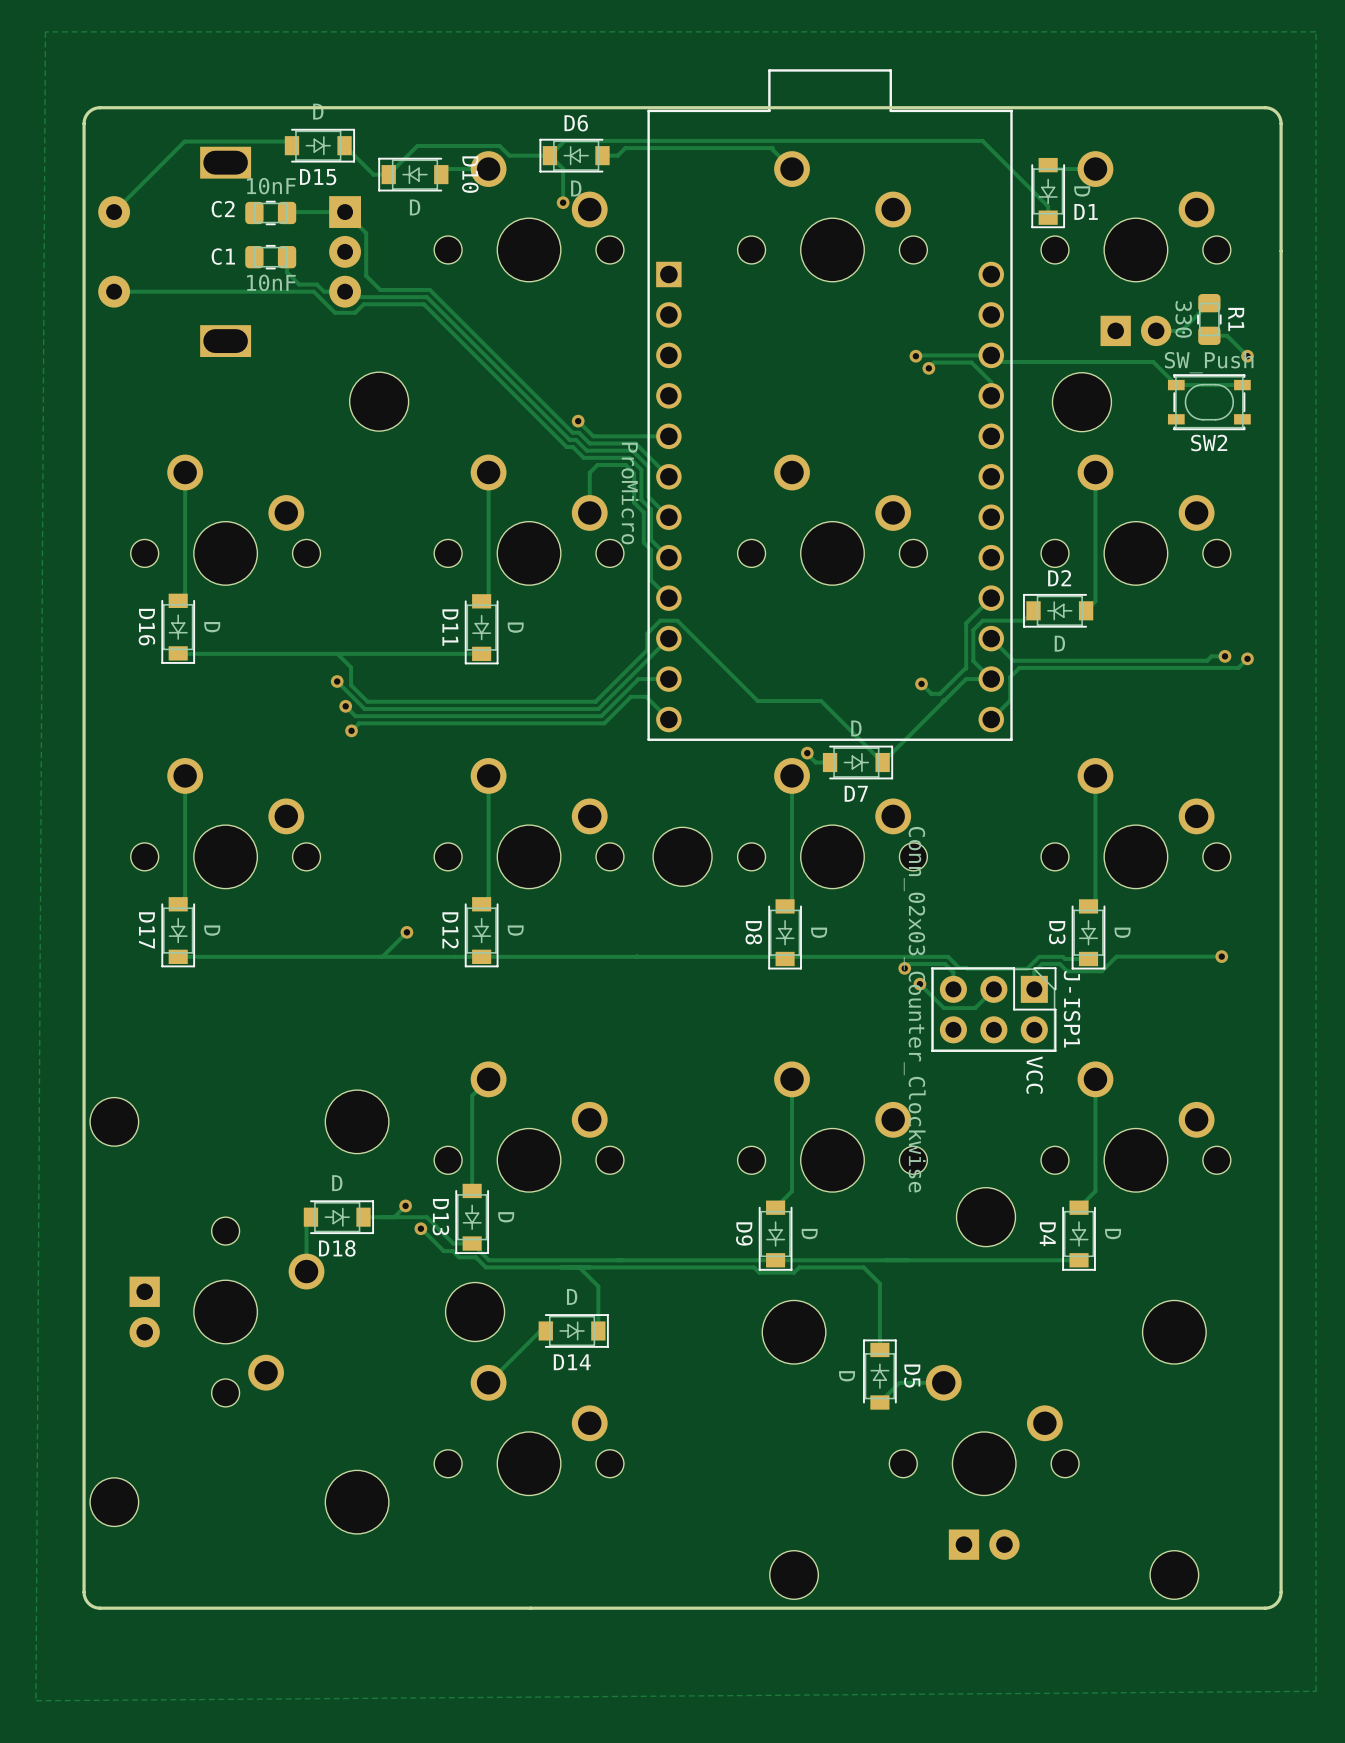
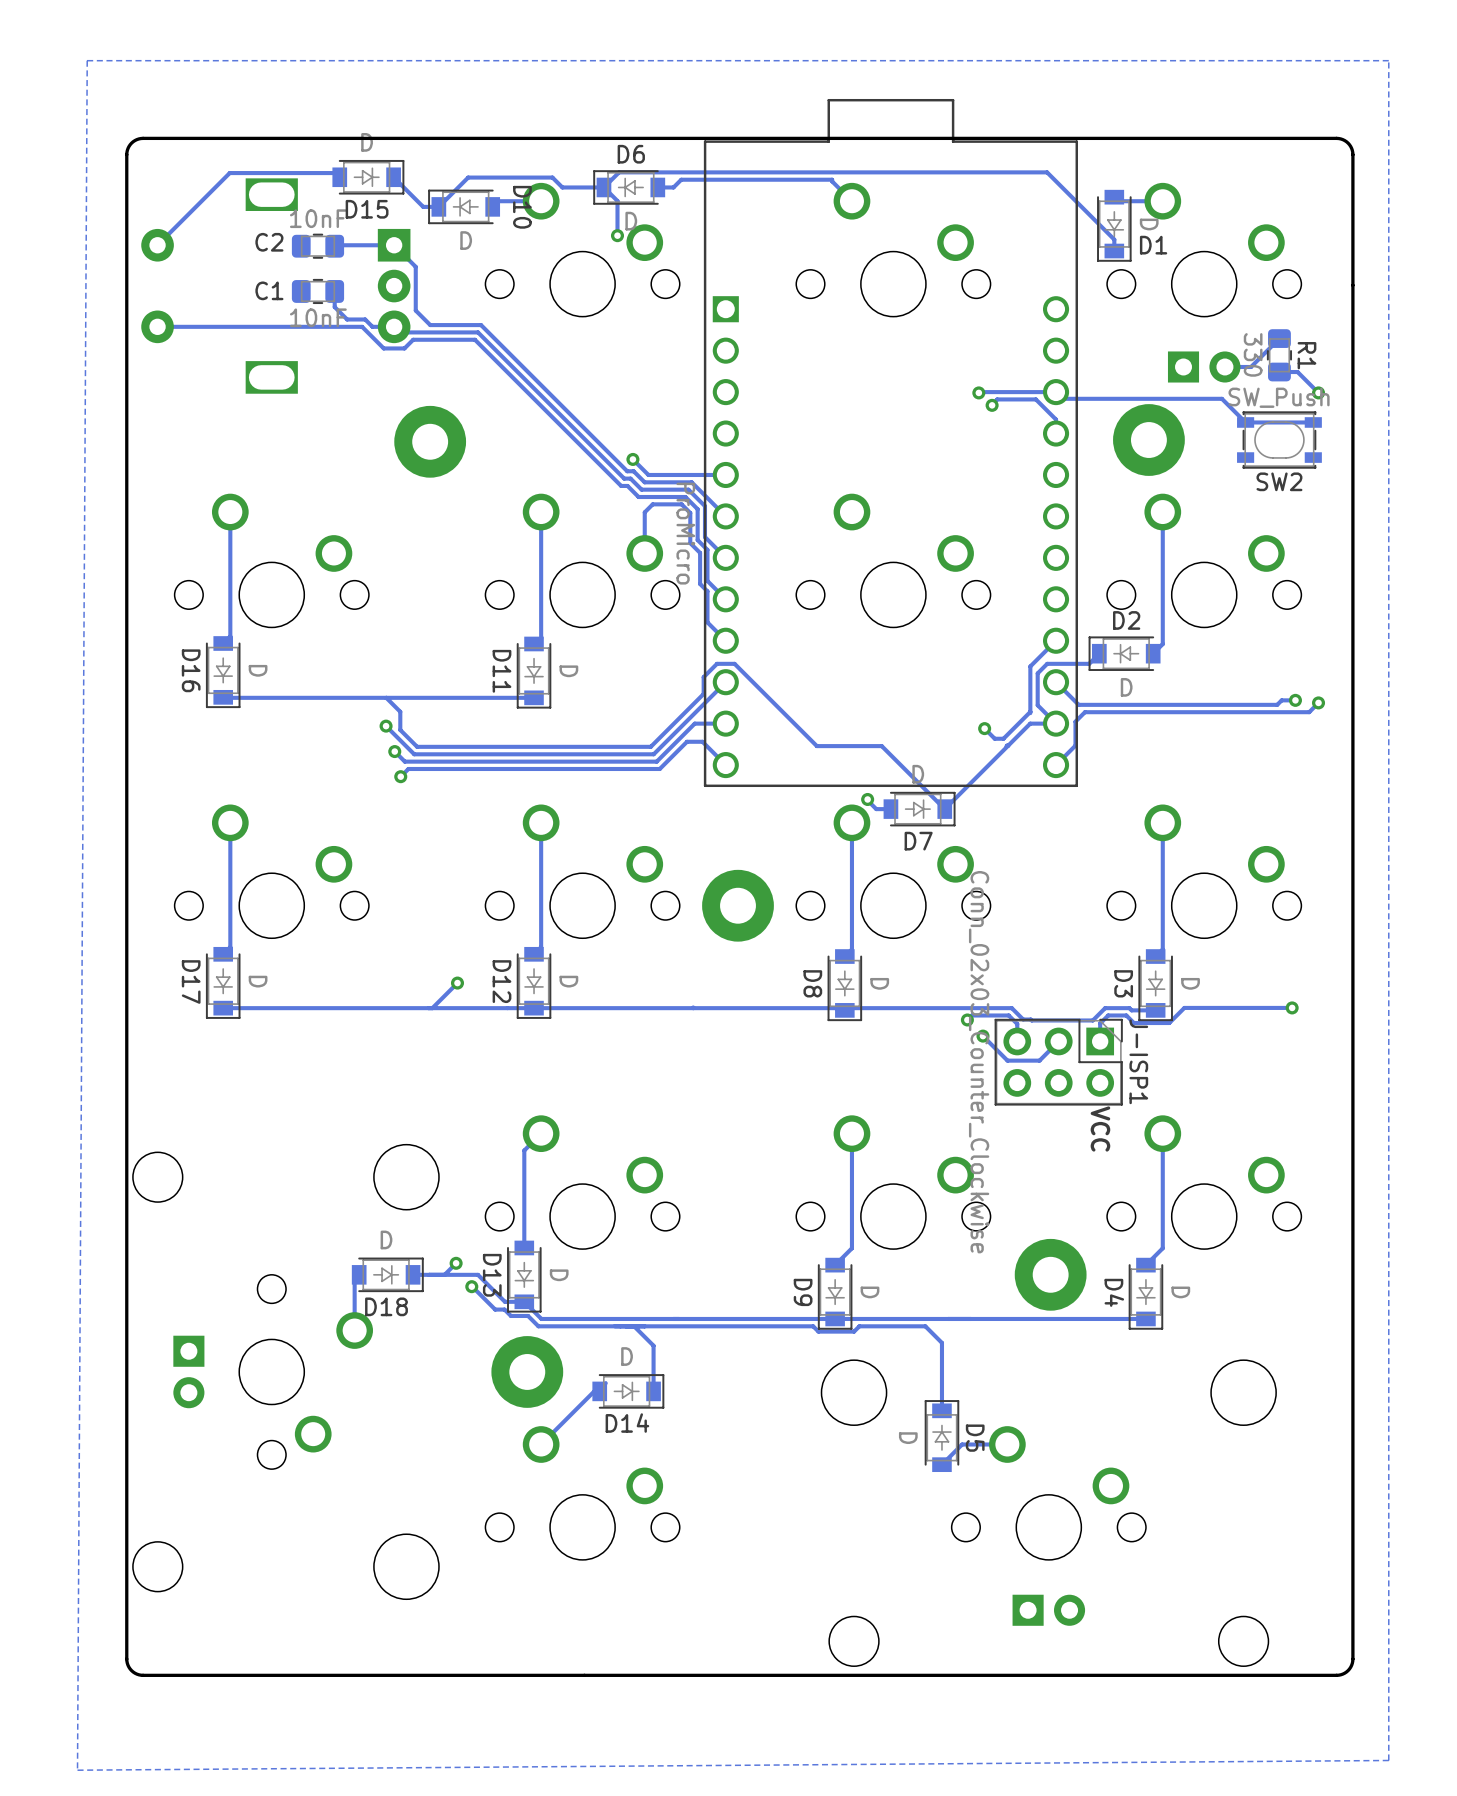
part footprint: [349, 372, 409, 432] -> [394, 405, 467, 478]
part footprint: [1052, 372, 1112, 432] -> [1113, 404, 1185, 476]
part footprint: [653, 827, 713, 887] -> [702, 869, 774, 942]
part footprint: [956, 1187, 1016, 1247] -> [1014, 1238, 1087, 1311]
part footprint: [445, 1282, 505, 1342] -> [491, 1336, 564, 1408]

